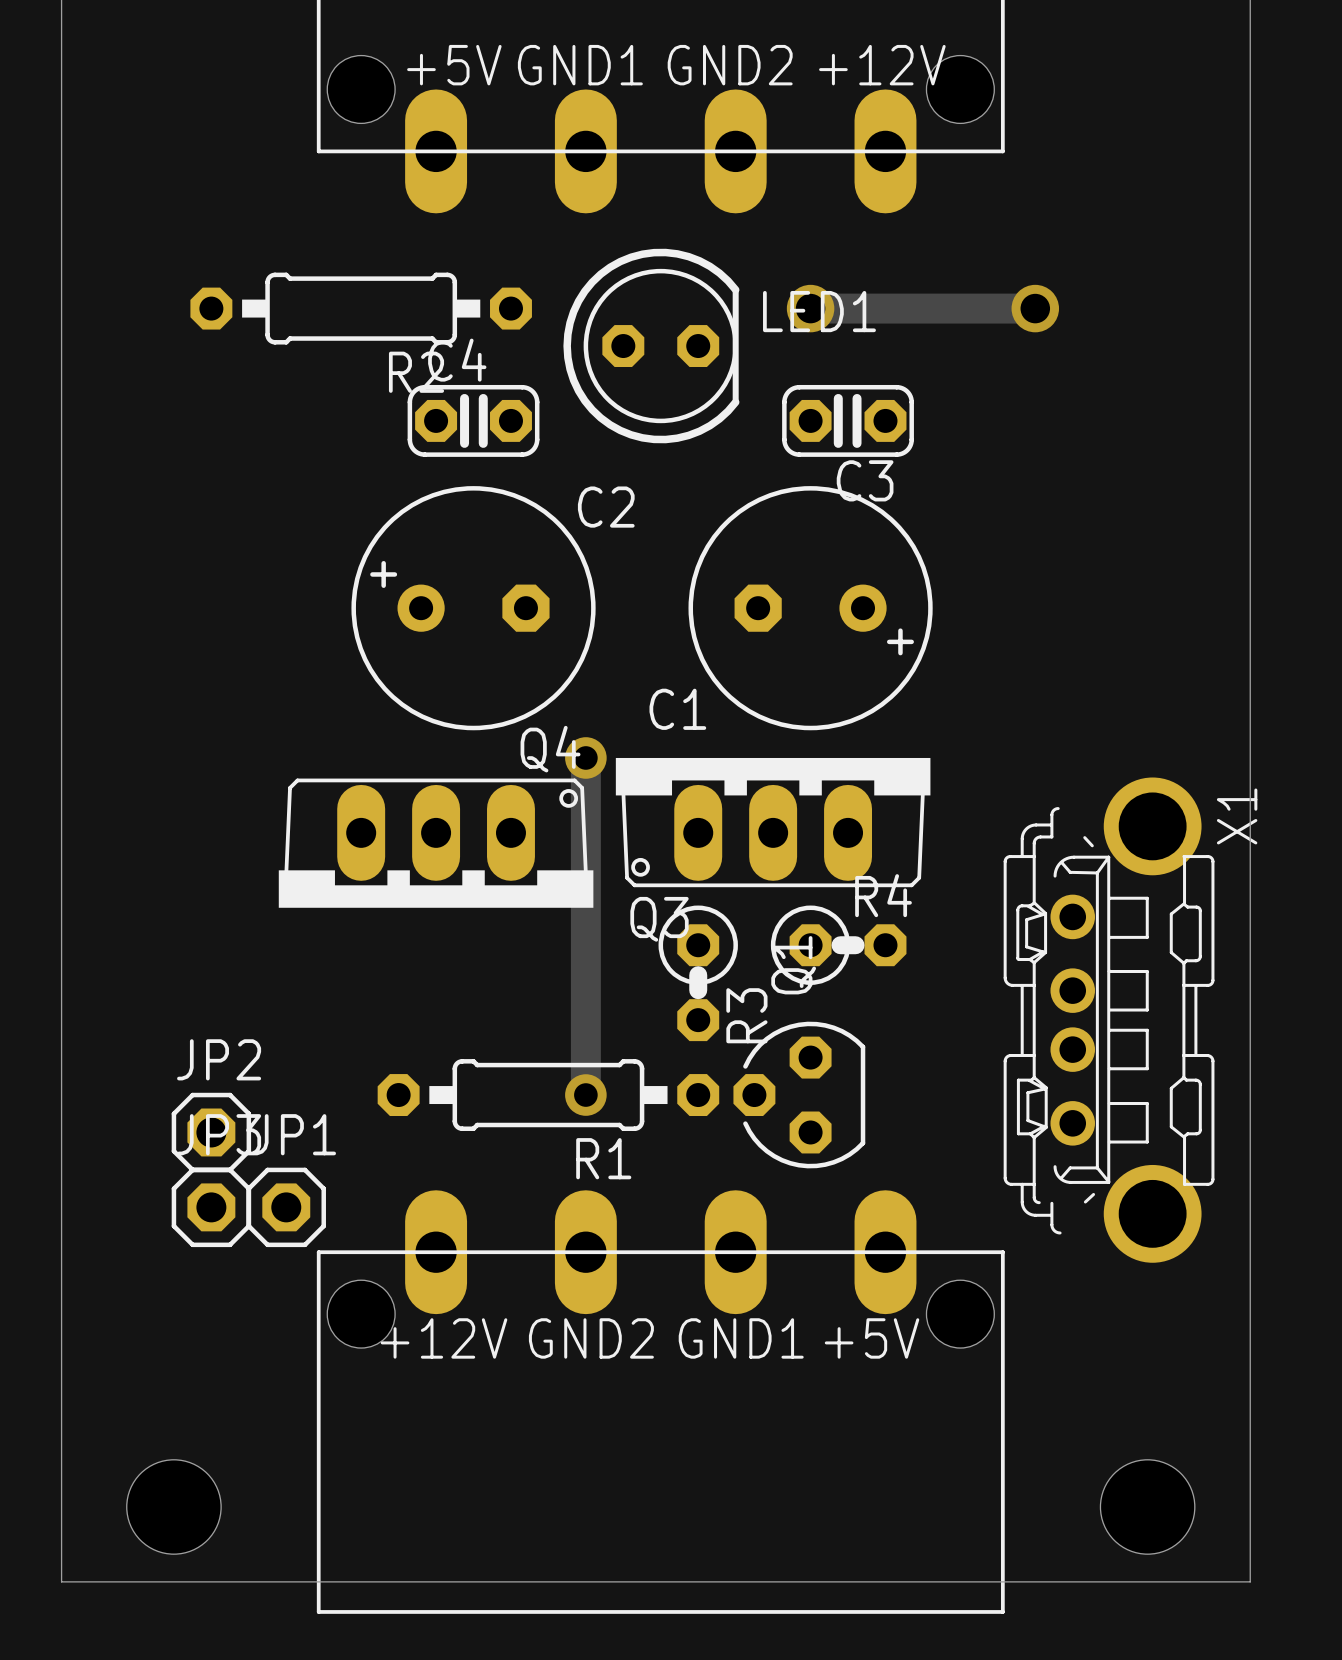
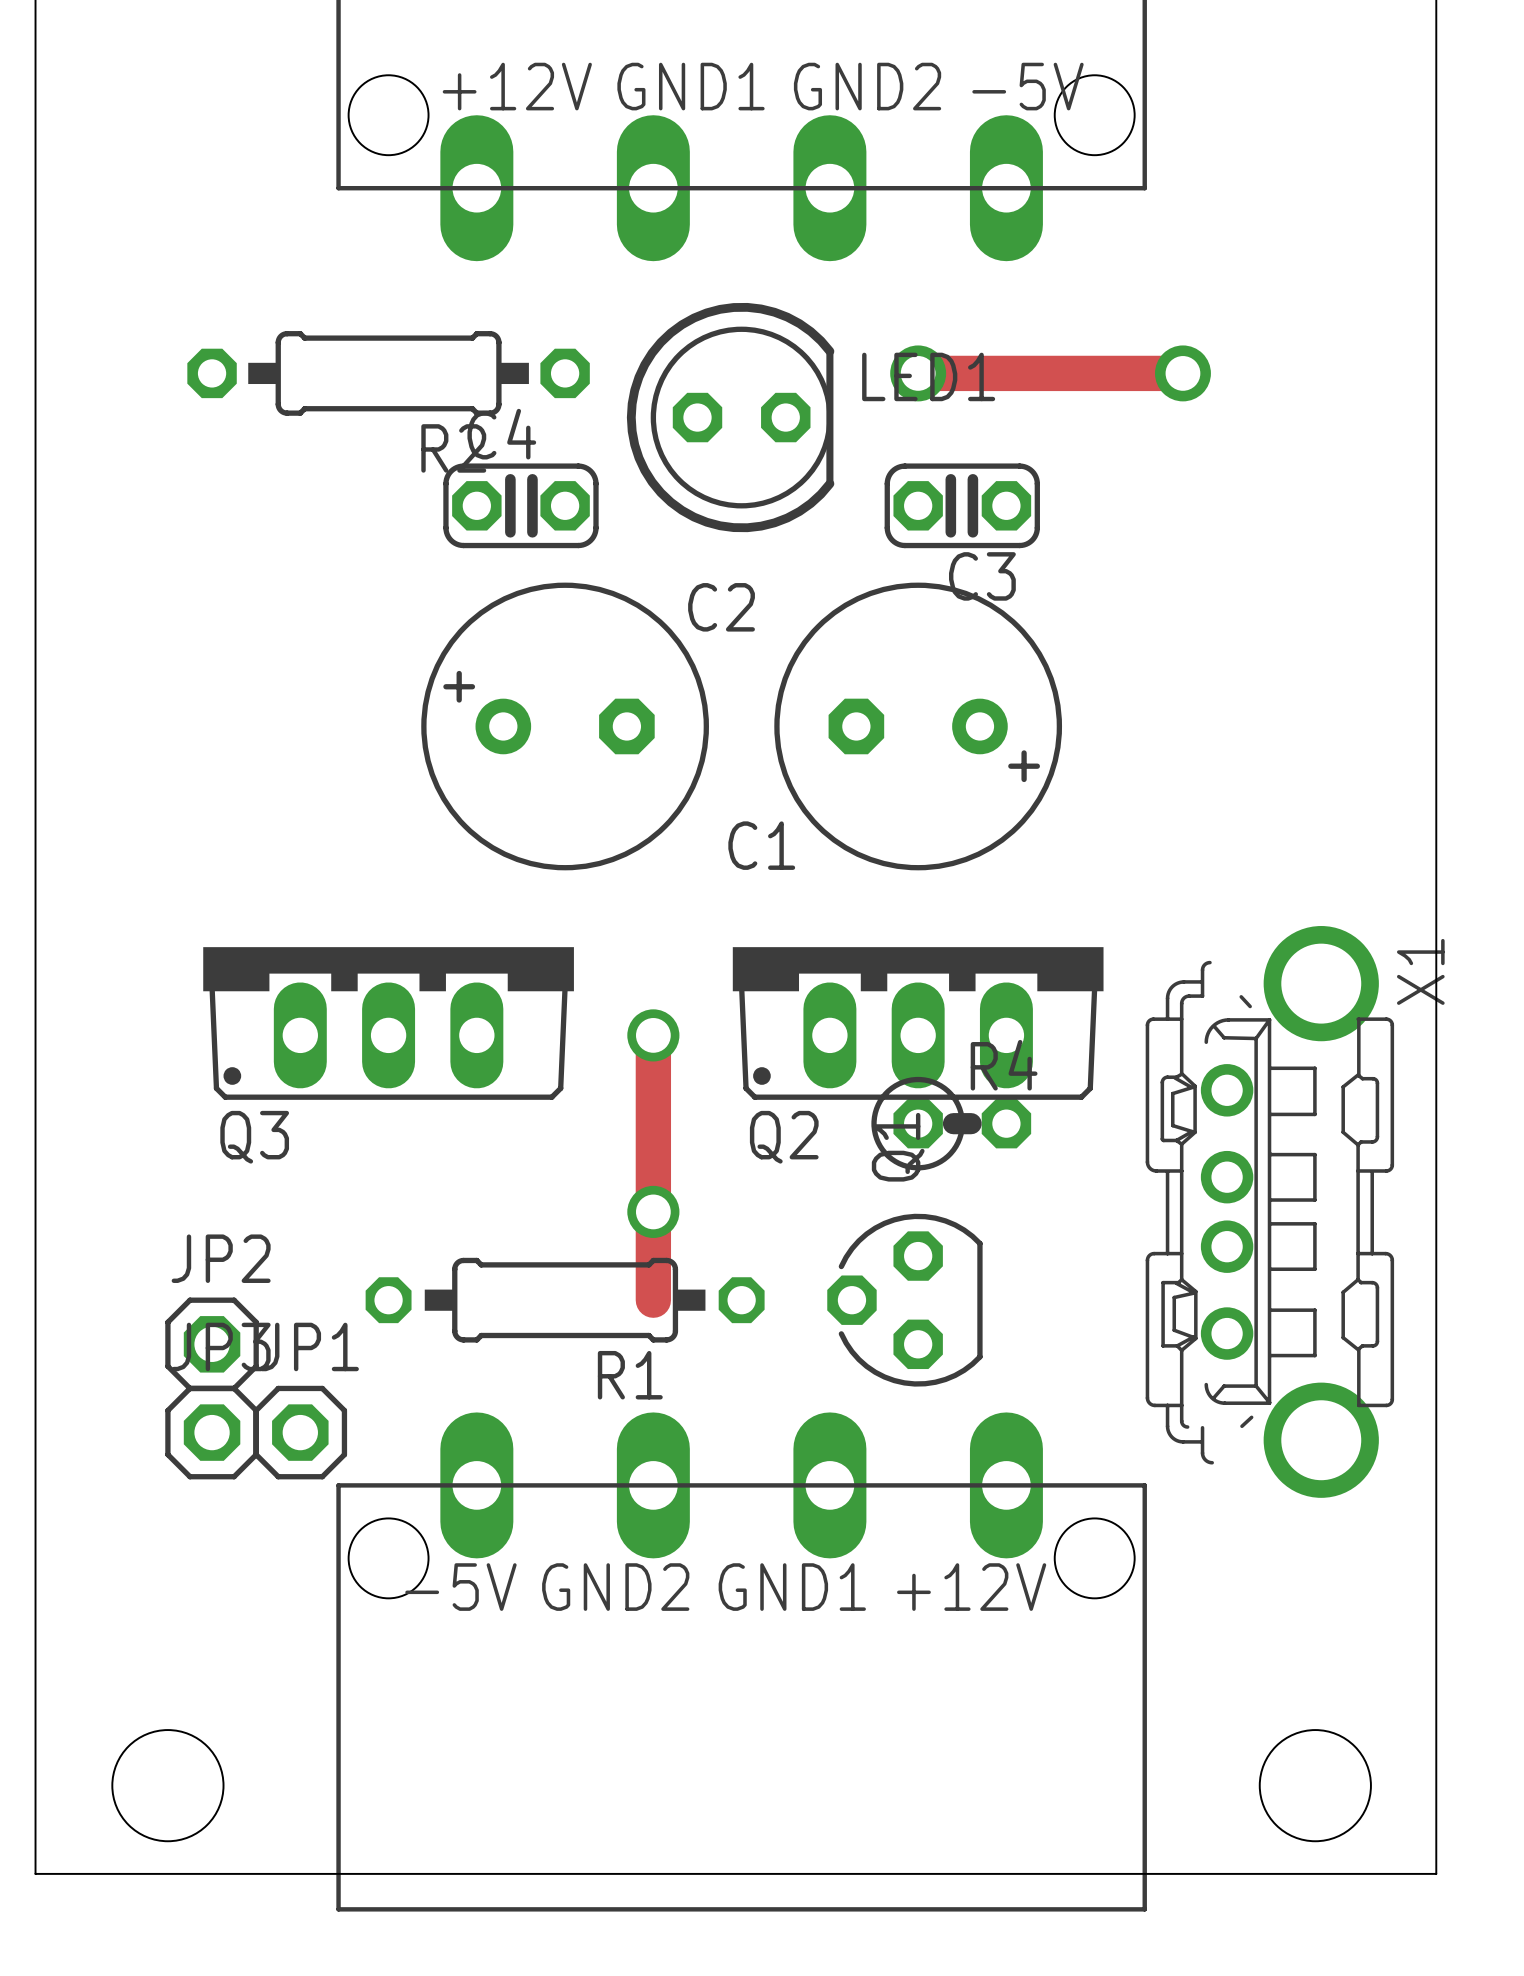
part text: +5V (454, 65) -> +12V (517, 86)
part text position: GND1 (580, 65) -> GND1 (691, 86)
part text position: GND2 (730, 65) -> GND2 (867, 86)
part text: +12V (882, 65) -> none
part text: none -> -5V (1027, 86)
C2 position: (473, 608) -> (565, 726)
track: (585, 757) (585, 870) -> none
via: (585, 757) -> none
Q3 footprint: [615, 757, 931, 888] -> [203, 947, 574, 1100]
Q4: (436, 843) -> none
Q2: none -> (918, 1023)
via: none -> (653, 1035)
R3: (698, 973) -> none
via: none -> (653, 1211)
R1 footprint: [377, 1059, 720, 1131] -> [365, 1257, 765, 1343]
via: (585, 1095) -> none
part text: none -> -5V (460, 1587)
part text: +12V (444, 1338) -> none
part text position: GND2 (591, 1338) -> GND2 (615, 1587)
part text position: GND1 (741, 1338) -> GND1 (792, 1587)
part text: +5V (872, 1338) -> +12V (971, 1587)

